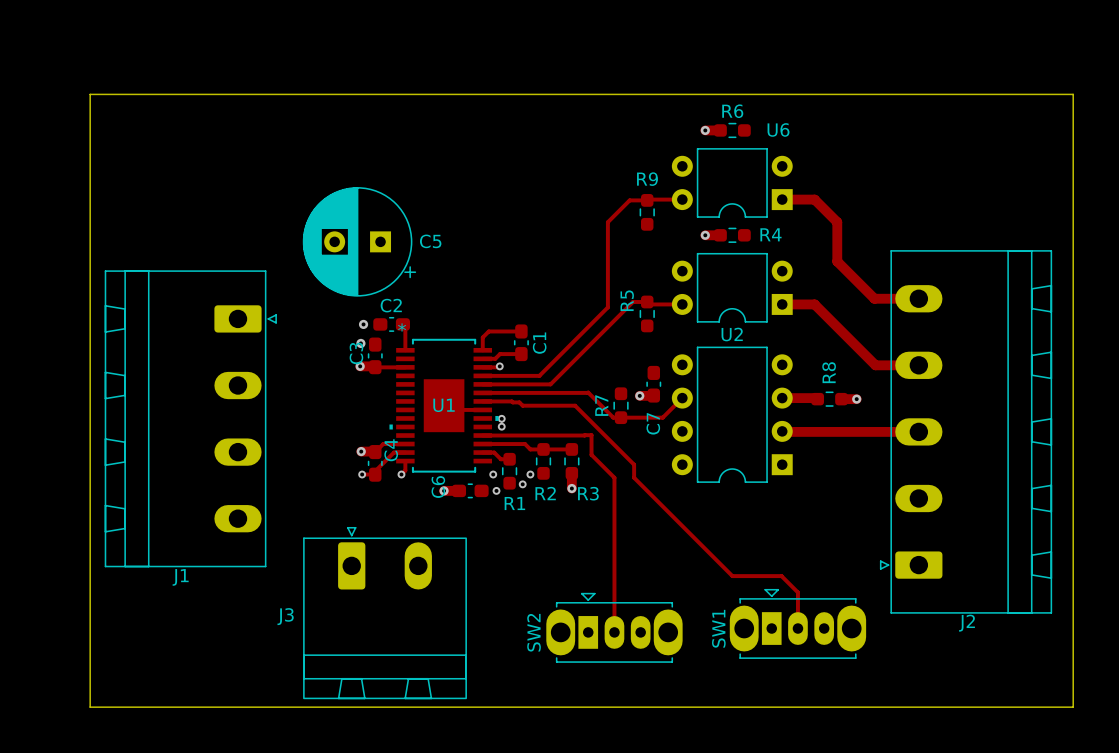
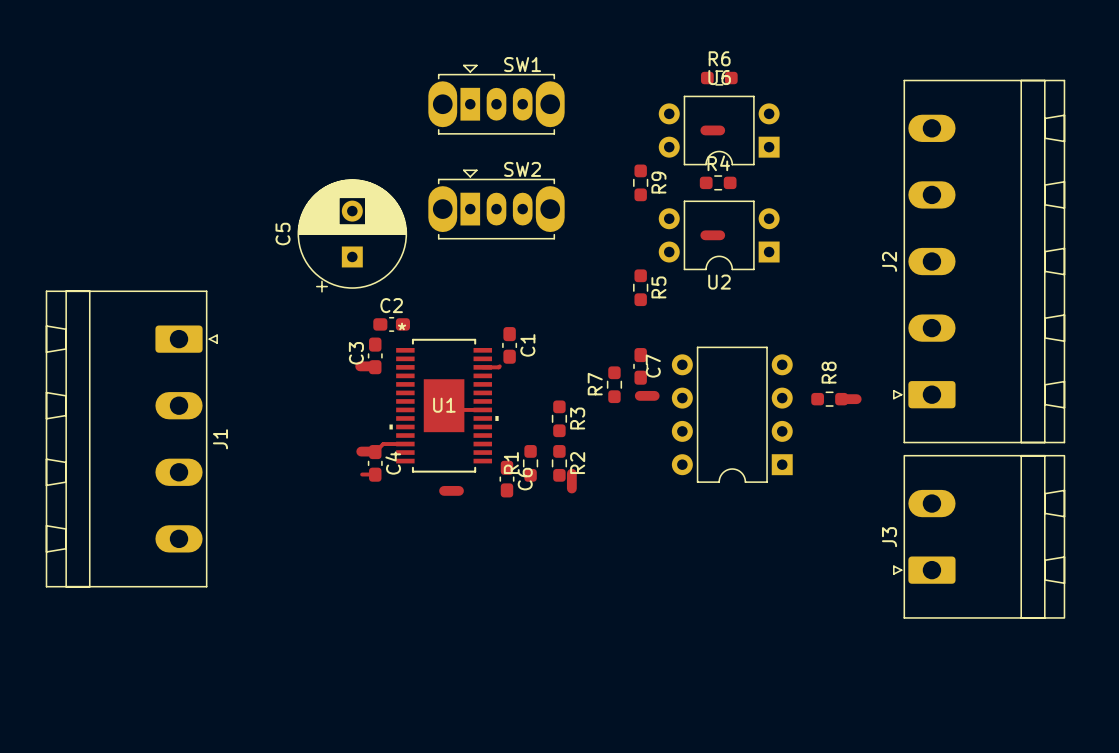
board edge: (90, 94) (1073, 94) (1073, 707) (90, 707) (90, 94) -> none
U6 name position: U6 (778, 129) -> U6 (719, 77)
via: (705, 130) -> none
R6 position: (732, 130) -> (719, 78)
R9 name rotation: 0° (647, 179) -> 90° counterclockwise (658, 182)
U6 position: (732, 182) -> (719, 130)
track: (682, 199) (629, 200) (607, 222) (607, 307) (539, 375) (482, 375) -> none
track: (782, 199) (814, 199) (837, 222) (837, 261) (874, 298) (918, 298) -> none
R9 position: (647, 212) -> (640, 182)
R4 name position: R4 (770, 234) -> R4 (718, 163)
via: (705, 235) -> none
R4 position: (732, 235) -> (718, 182)
C5 rotation: 0° (359, 241) -> 90° clockwise (352, 235)
C5 name position: C5 (430, 241) -> C5 (283, 234)
U2 position: (732, 287) -> (719, 235)
R5 name position: R5 (627, 300) -> R5 (658, 287)
track: (682, 304) (649, 304) (647, 301) (632, 301) (550, 384) (482, 384) -> none
track: (782, 304) (814, 304) (875, 365) (918, 365) -> none
R5 position: (647, 313) -> (640, 287)
via: (363, 324) -> none
track: (402, 324) (405, 326) (405, 350) -> none
track: (521, 331) (488, 331) (482, 337) (482, 350) -> none
C1 position: (521, 342) -> (509, 345)
via: (360, 343) -> none
track: (521, 354) (499, 354) (495, 358) (482, 358) -> none
via: (360, 366) -> none
via: (499, 366) -> none
track: (375, 367) (405, 367) -> none
C7 position: (653, 384) -> (640, 366)
track: (482, 392) (588, 392) (613, 417) (662, 417) (682, 398) -> none
via: (639, 395) -> none
track: (782, 398) (817, 399) -> none
via: (856, 399) -> none
track: (482, 401) (511, 401) (519, 402) (522, 405) (575, 405) (634, 464) (634, 477) (732, 576) (781, 576) (797, 592) (797, 628) -> none
R7 position: (621, 405) -> (614, 384)
J1 position: (190, 418) -> (131, 438)
via: (501, 418) -> none
C7 name position: C7 (653, 423) -> C7 (653, 366)
via: (501, 426) -> none
track: (782, 431) (918, 431) -> none
J2 position: (966, 431) -> (979, 261)
track: (482, 435) (591, 435) (591, 454) (614, 477) (614, 632) -> none
track: (482, 444) (525, 444) (530, 449) (571, 449) -> none
C4 name position: C4 (391, 450) -> C4 (393, 463)
via: (361, 451) -> none
track: (405, 452) (393, 452) (375, 471) (375, 474) -> none
track: (482, 452) (494, 452) (500, 459) (509, 459) -> none
track: (405, 461) (405, 470) (401, 474) -> none
R2 position: (543, 461) -> (559, 463)
R3 position: (571, 461) -> (559, 418)
R1 position: (509, 471) -> (530, 463)
via: (362, 474) -> none
via: (401, 474) -> none
via: (493, 474) -> none
via: (530, 474) -> none
via: (522, 484) -> none
C6 name position: C6 (438, 487) -> C6 (525, 479)
via: (571, 488) -> none
via: (444, 490) -> none
C6 rotation: 0° (470, 490) -> 90° clockwise (506, 479)
C6 position: (470, 490) -> (506, 479)
via: (496, 490) -> none
R2 name rotation: 0° (545, 493) -> 90° counterclockwise (577, 463)
R2 name position: R2 (545, 493) -> R2 (577, 463)
R3 name rotation: 0° (588, 493) -> 90° counterclockwise (577, 418)
R3 name position: R3 (588, 493) -> R3 (577, 418)
R1 name rotation: 0° (514, 503) -> 90° counterclockwise (511, 463)
R1 name position: R1 (514, 503) -> R1 (511, 463)
J1 name rotation: 0° (180, 577) -> 90° counterclockwise (220, 439)
J1 name position: J1 (180, 577) -> J1 (220, 439)
J3 rotation: 0° (385, 613) -> 90° counterclockwise (979, 536)
J3 position: (385, 613) -> (979, 536)
SW1 position: (797, 623) -> (496, 99)
J2 name rotation: 0° (966, 623) -> 90° counterclockwise (889, 261)
J2 name position: J2 (966, 623) -> J2 (889, 261)
SW2 position: (614, 627) -> (496, 204)
SW1 name rotation: 0° (718, 628) -> 90° clockwise (522, 64)
SW1 name position: SW1 (718, 628) -> SW1 (522, 64)
SW2 name rotation: 0° (534, 632) -> 90° clockwise (522, 169)
SW2 name position: SW2 (534, 632) -> SW2 (522, 169)

